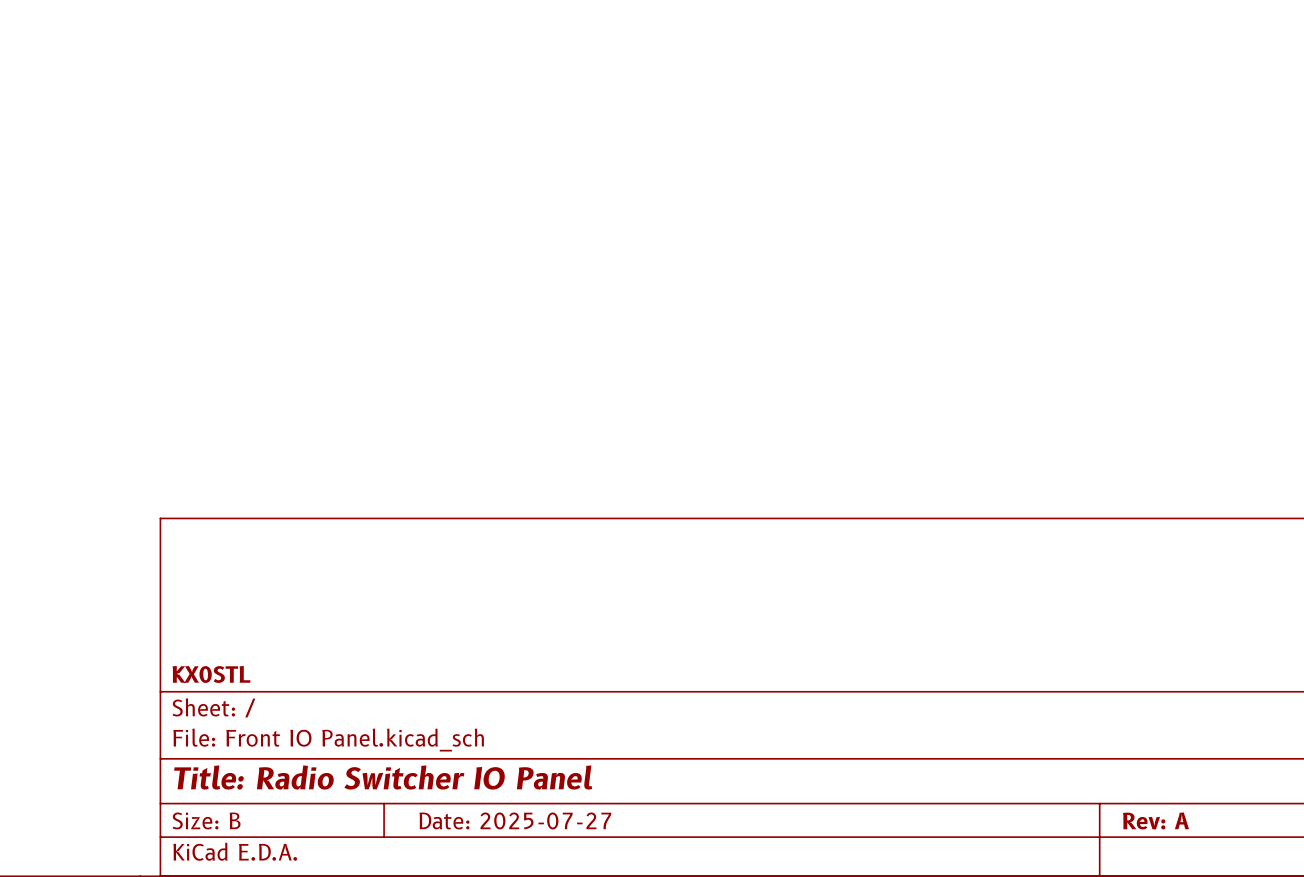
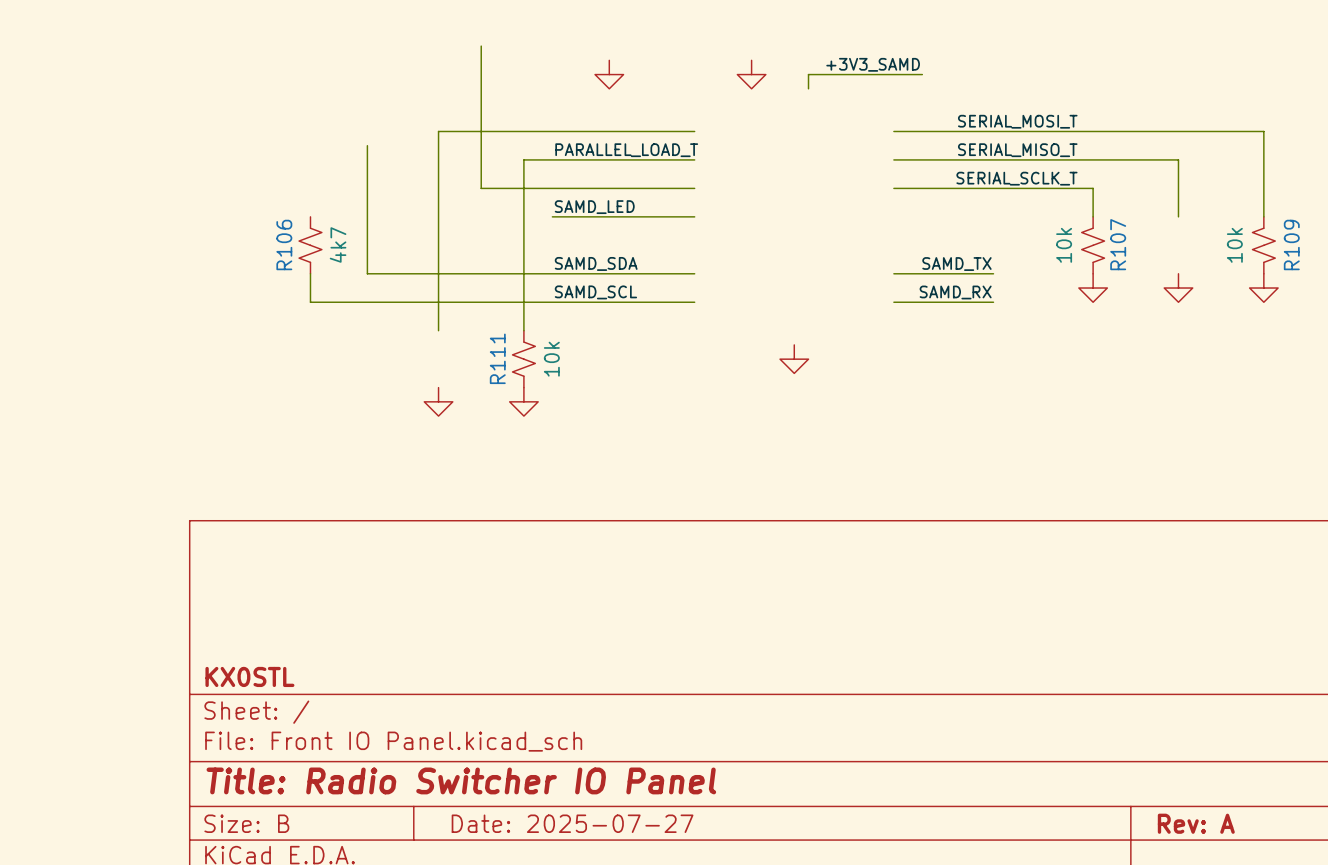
wire: none -> (481, 46) (481, 188) (694, 188)
label: none -> +3V3_SAMD (873, 64)
power symbol: none -> (609, 74)
power symbol: none -> (751, 74)
wire: none -> (922, 74) (808, 74) (808, 88)
label: none -> SERIAL_MOSI_T (1017, 121)
wire: none -> (694, 131) (438, 131) (438, 330)
wire: none -> (893, 131) (1263, 131) (1263, 216)
wire: none -> (367, 145) (367, 273) (694, 273)
label: none -> PARALLEL_LOAD_T (626, 150)
label: none -> SERIAL_MISO_T (1017, 150)
wire: none -> (694, 159) (523, 159) (523, 330)
wire: none -> (893, 159) (1178, 159) (1178, 216)
label: none -> SERIAL_SCLK_T (1016, 178)
wire: none -> (893, 188) (1093, 188) (1093, 216)
label: none -> SAMD_LED (594, 207)
wire: none -> (552, 216) (694, 216)
R106: none -> 4k7 (310, 245)
R107: none -> 10k (1093, 245)
R109: none -> 10k (1263, 245)
label: none -> SAMD_SDA (596, 263)
label: none -> SAMD_TX (956, 264)
wire: none -> (310, 273) (310, 302) (694, 302)
wire: none -> (893, 273) (993, 273)
power symbol: none -> (1093, 288)
power symbol: none -> (1178, 288)
power symbol: none -> (1263, 288)
label: none -> SAMD_SCL (595, 292)
label: none -> SAMD_RX (955, 292)
wire: none -> (893, 302) (993, 302)
R111: none -> 10k (523, 359)
power symbol: none -> (794, 359)
power symbol: none -> (438, 401)
power symbol: none -> (523, 401)

